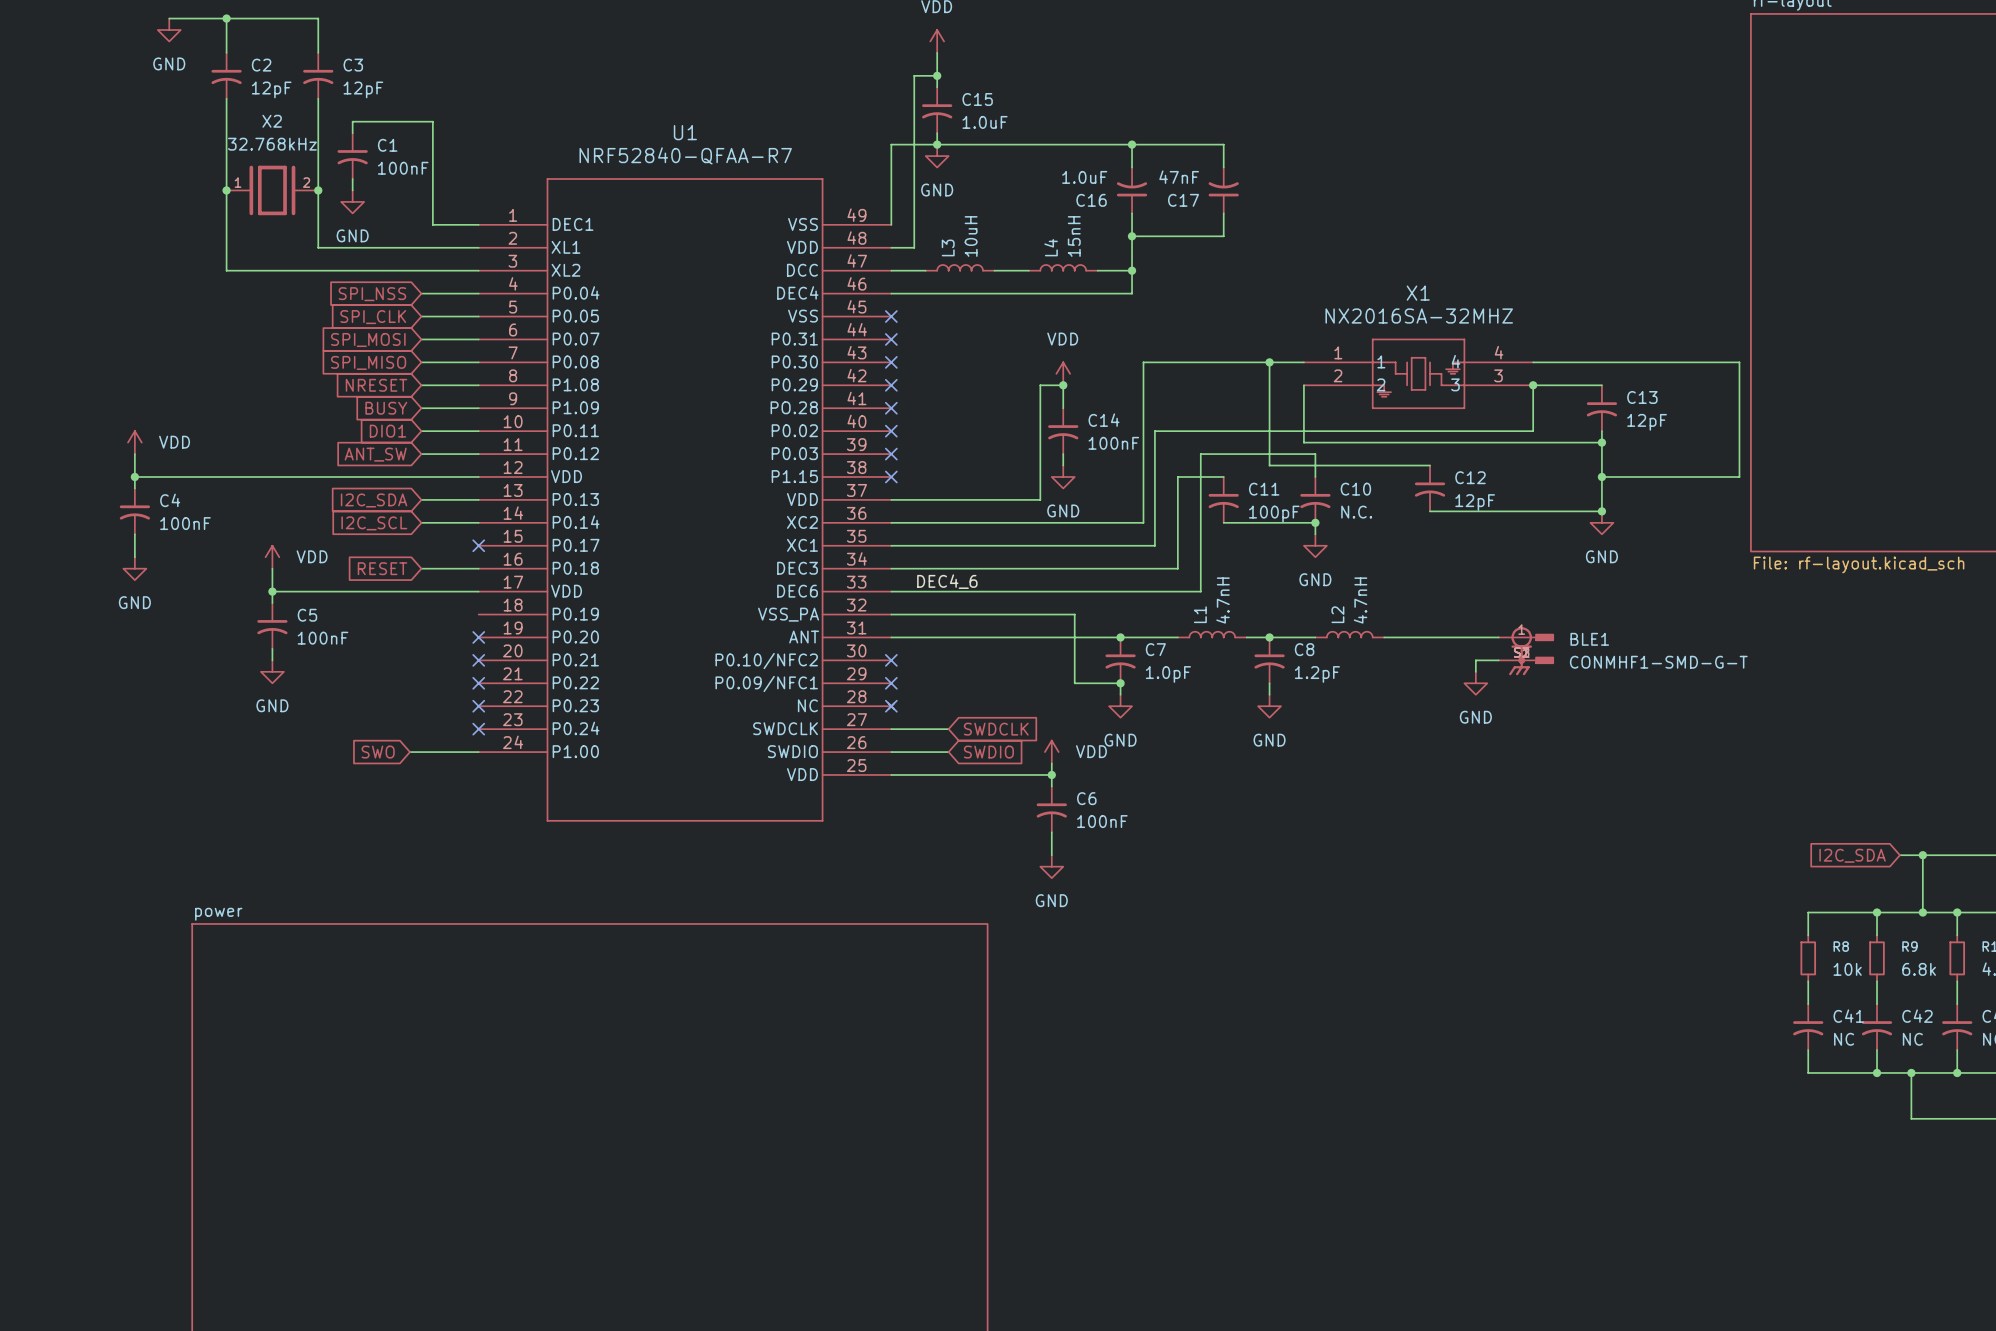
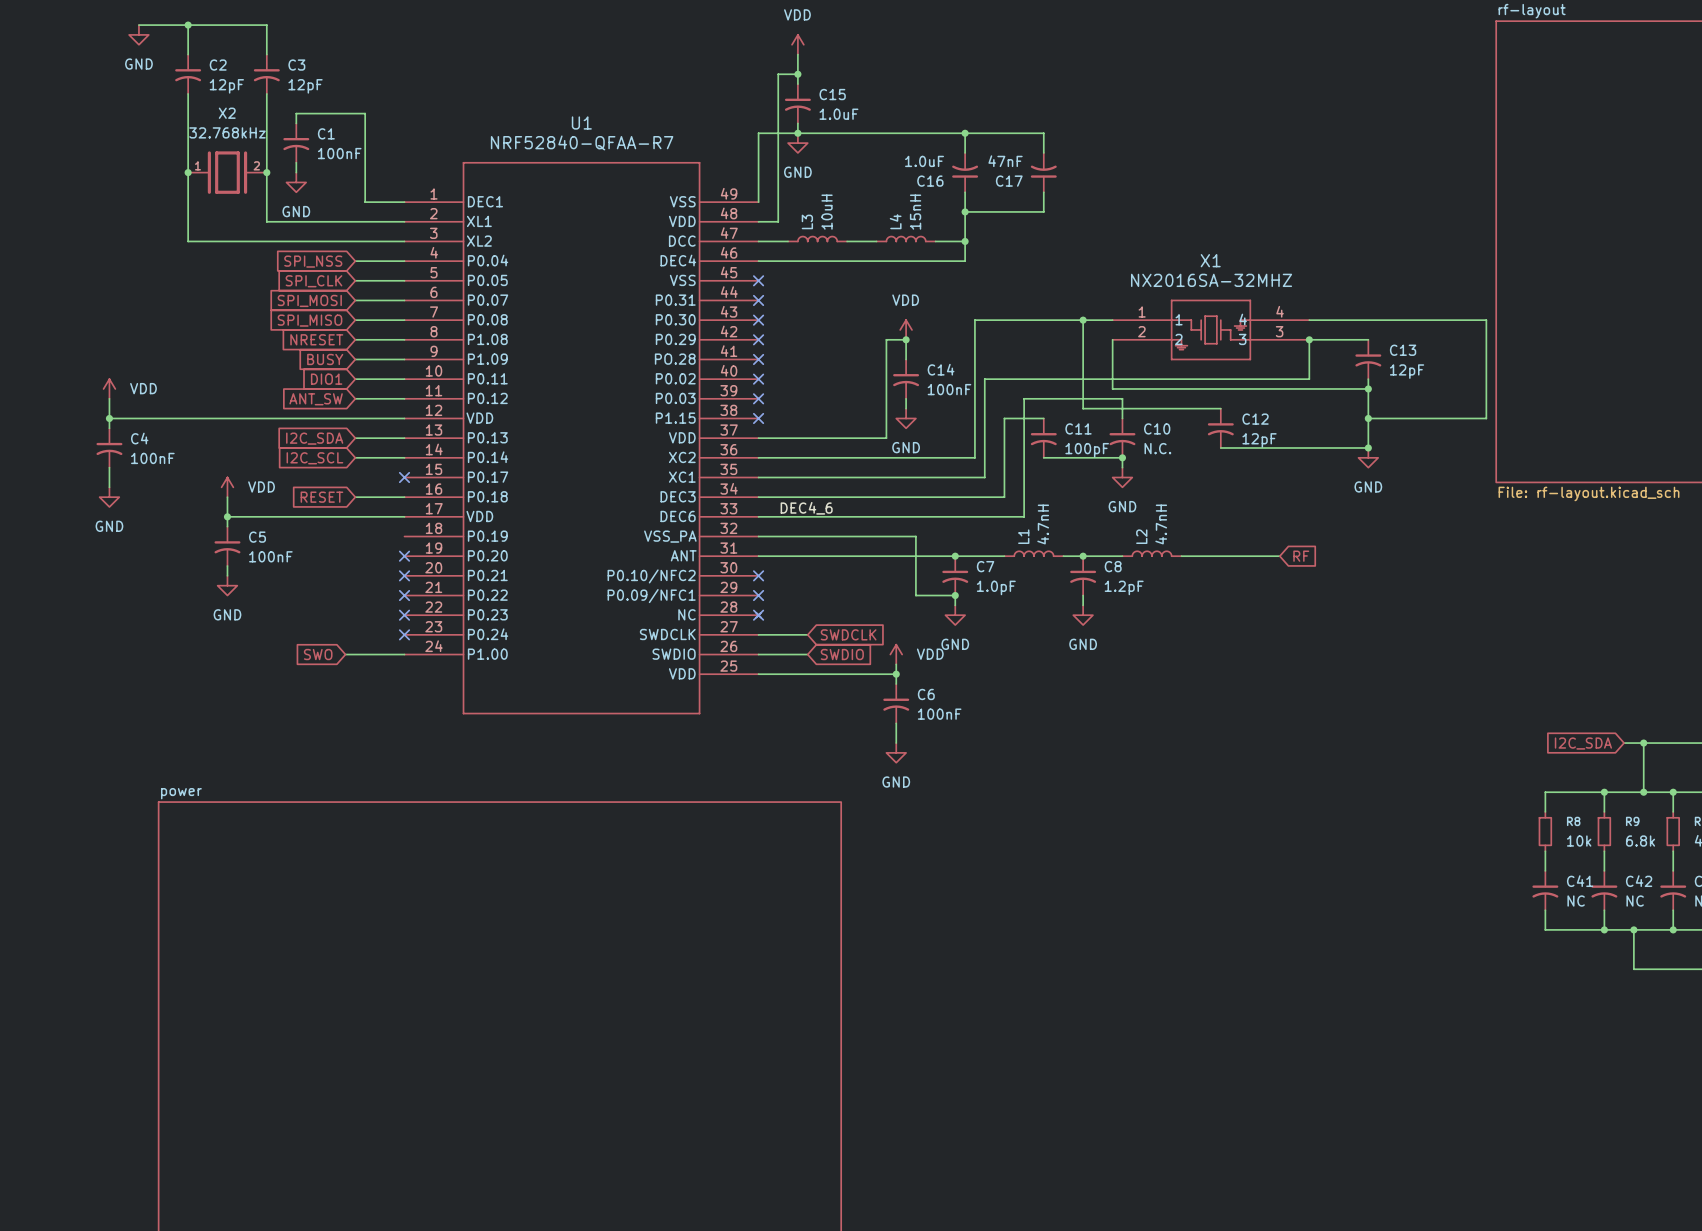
global label: none -> RF (1301, 556)
BLE1: CONMHF1-SMD-G-T (1526, 651) -> none
wire: (1498, 660) (1475, 660) (1475, 671) -> none
power symbol: GND (1475, 683) -> none

